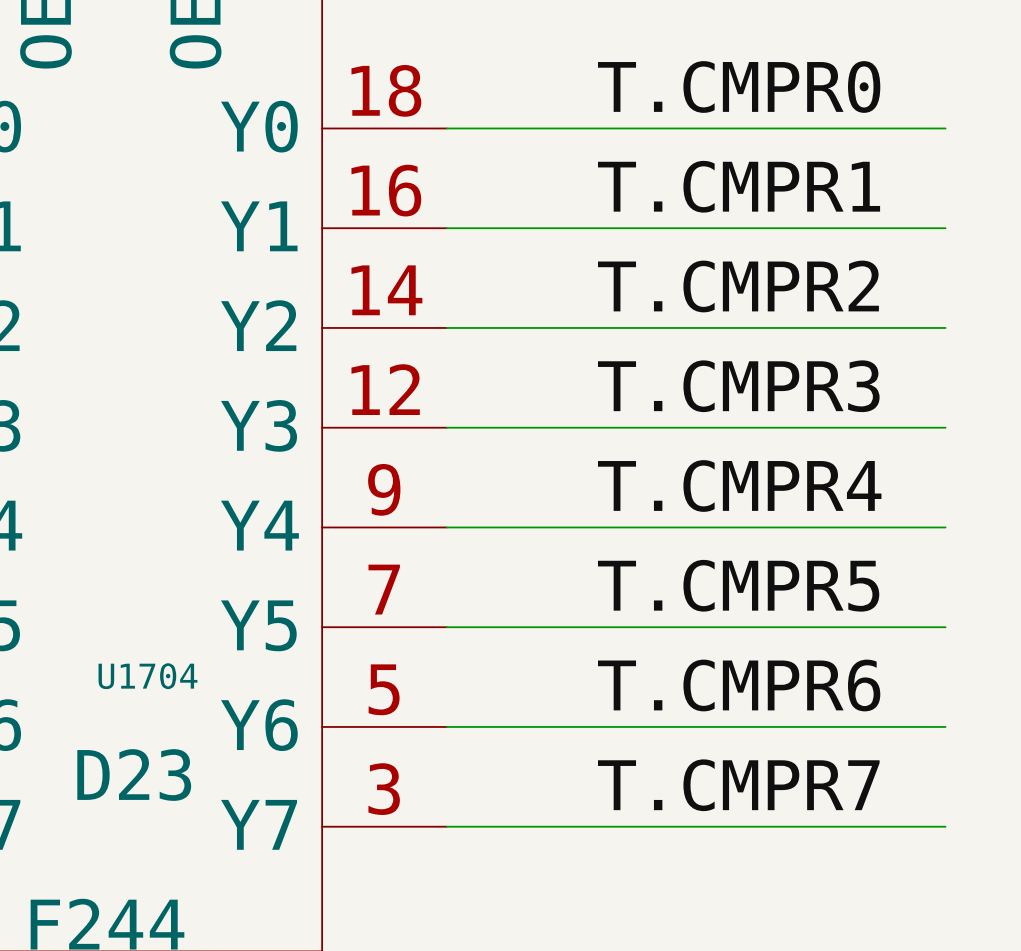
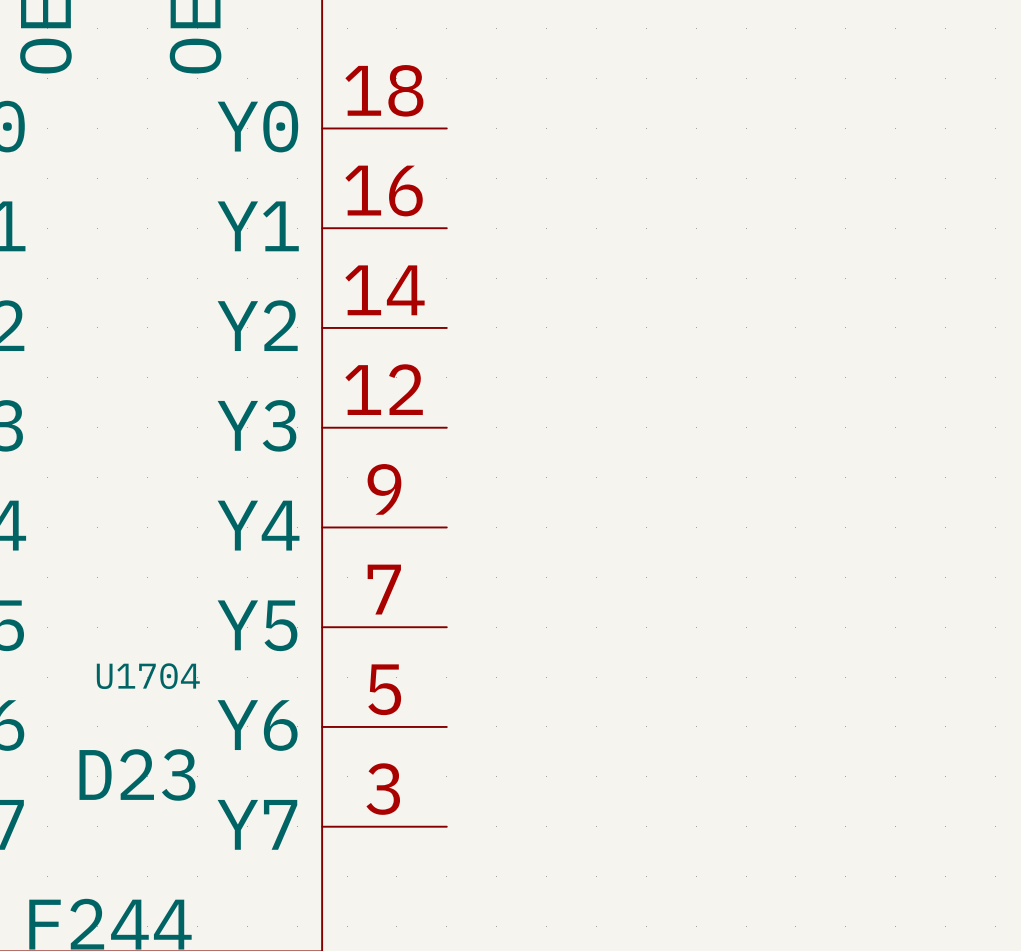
label: T.CMPR0 (739, 86) -> none
wire: (446, 128) (945, 128) -> none
label: T.CMPR1 (739, 186) -> none
wire: (446, 228) (945, 228) -> none
label: T.CMPR2 (738, 286) -> none
wire: (446, 327) (945, 327) -> none
label: T.CMPR3 (738, 386) -> none
wire: (446, 427) (945, 427) -> none
label: T.CMPR4 (739, 485) -> none
wire: (446, 527) (945, 527) -> none
label: T.CMPR5 (738, 585) -> none
wire: (446, 627) (945, 627) -> none
label: T.CMPR6 (739, 685) -> none
wire: (446, 726) (945, 726) -> none
label: T.CMPR7 (738, 785) -> none
wire: (446, 826) (945, 826) -> none

